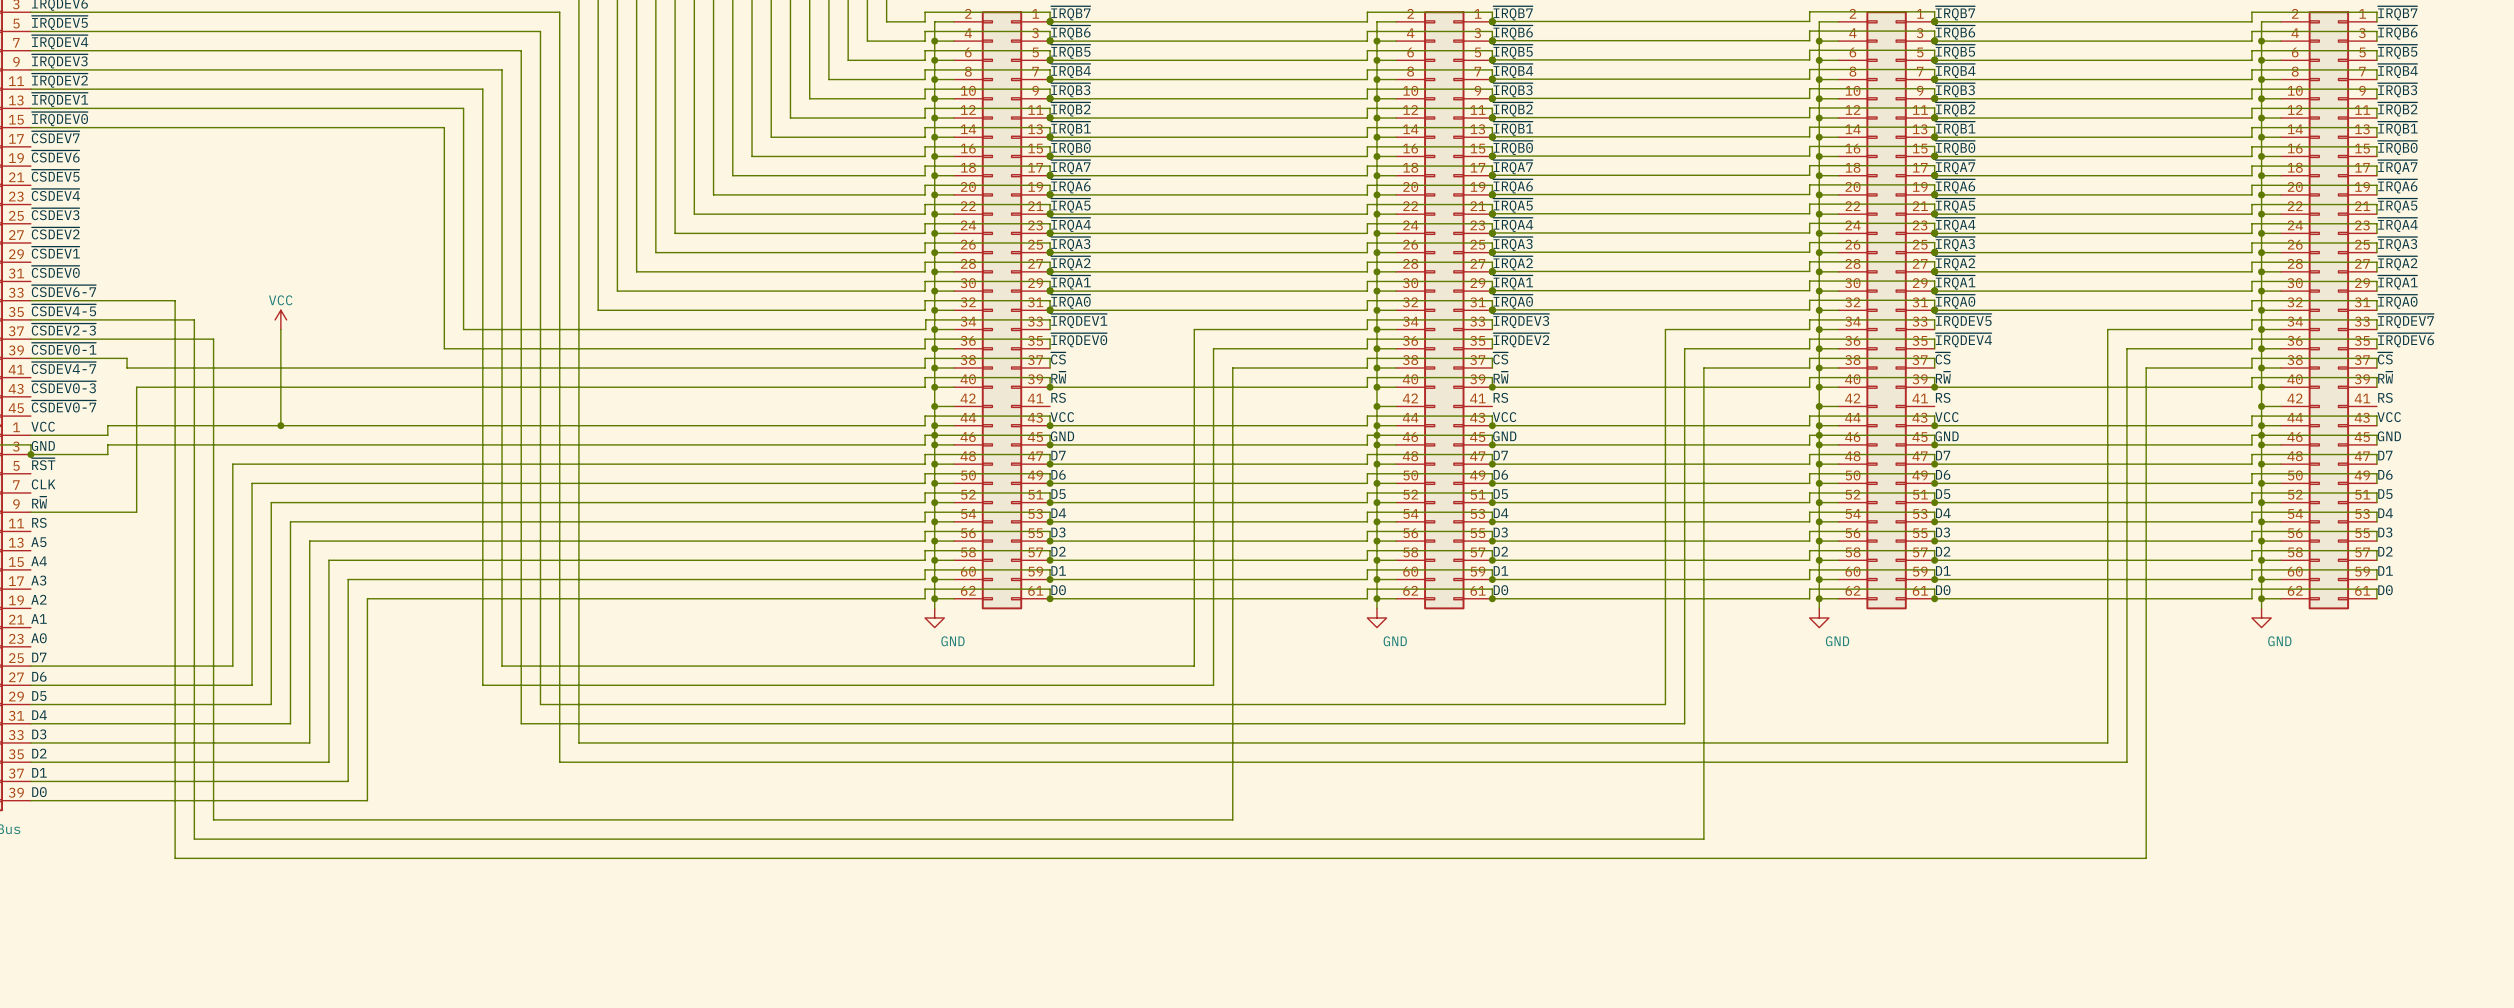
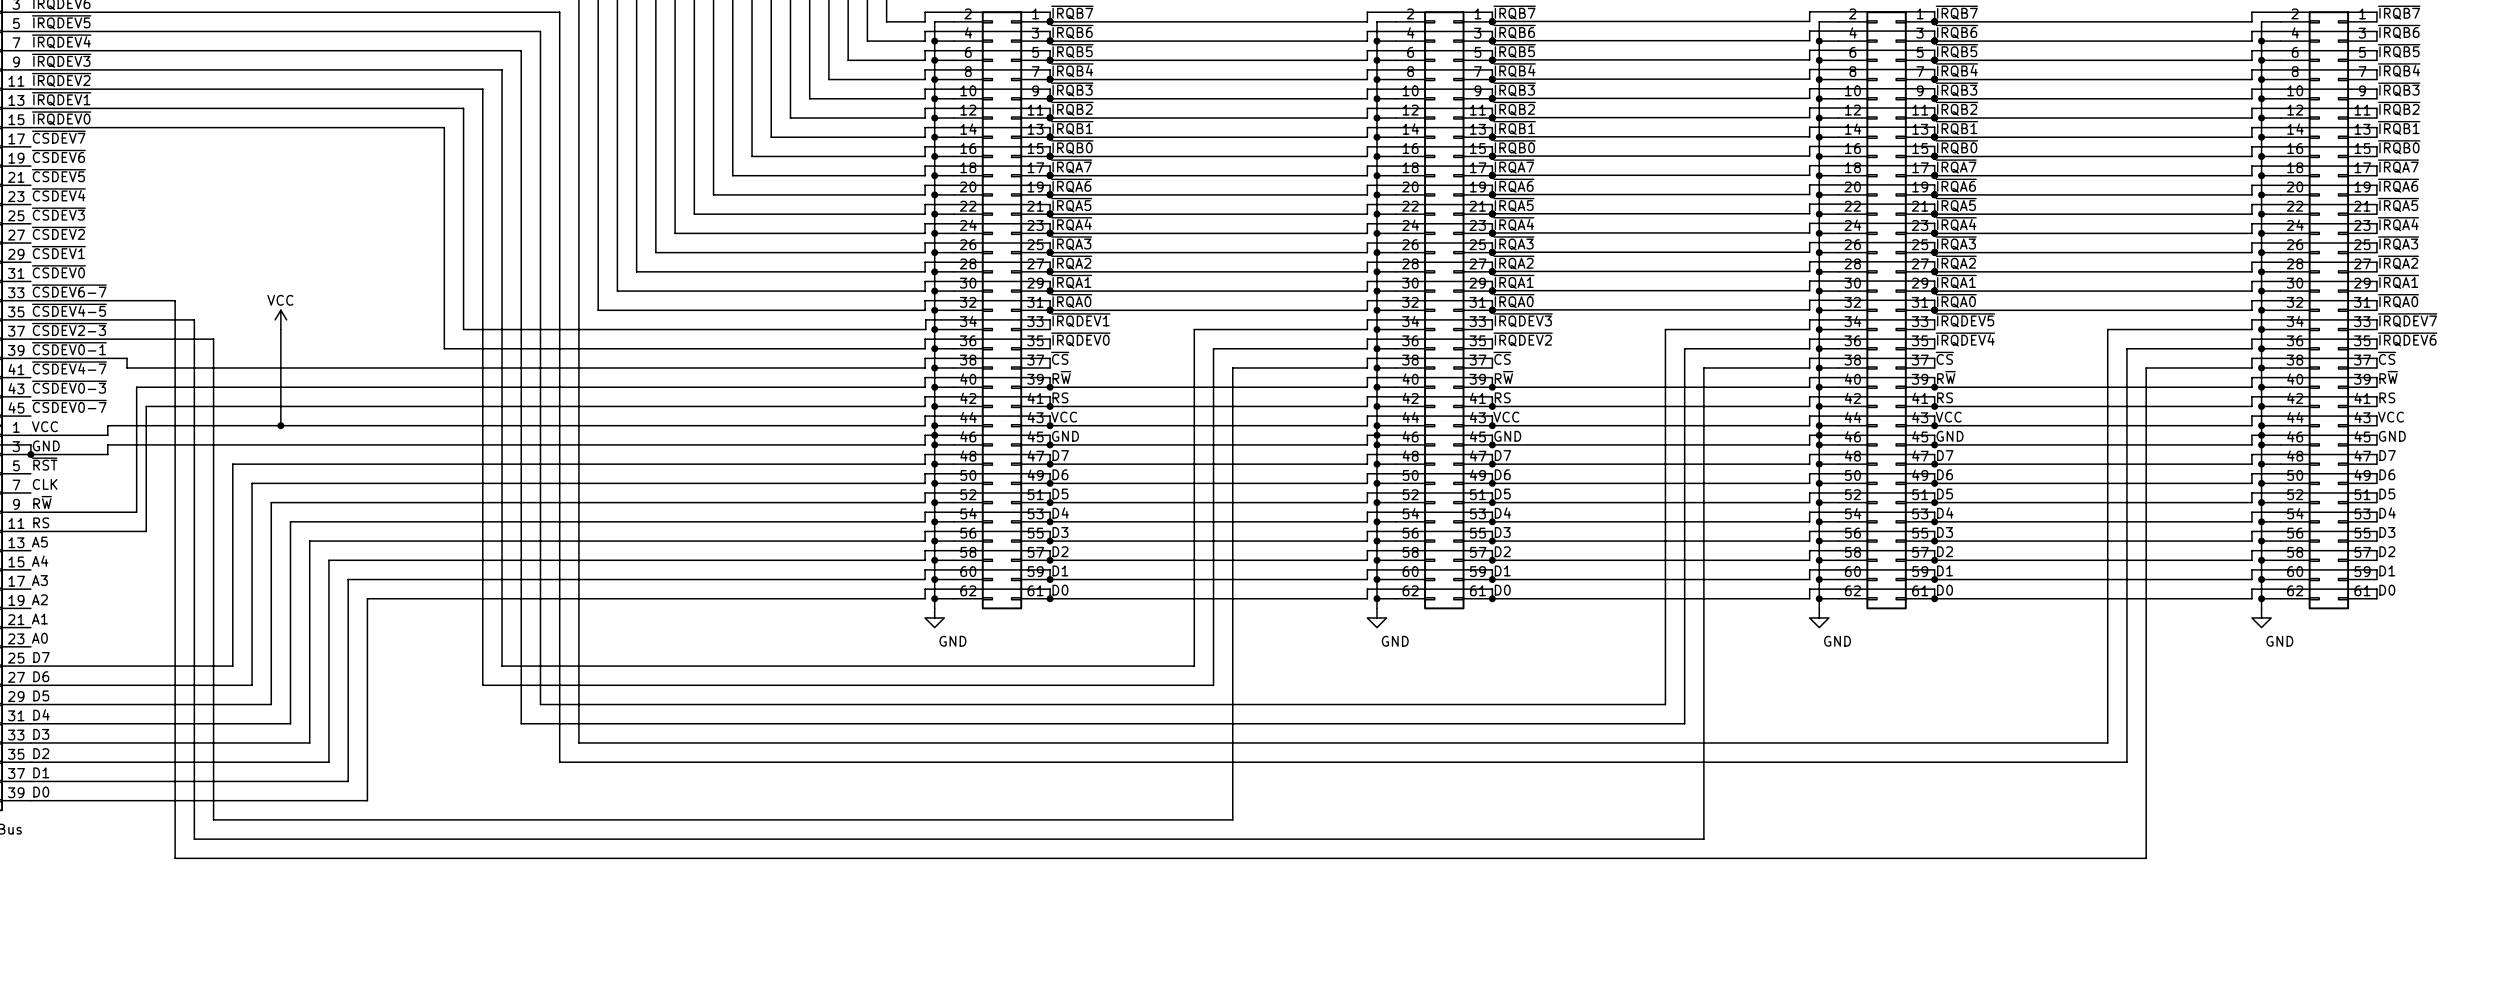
junction: none -> (1050, 406)
junction: none -> (1492, 406)
junction: none -> (1934, 406)
wire: none -> (2376, 406) (2376, 396) (2251, 396) (2251, 406) (1934, 406) (1934, 396) (1809, 396) (1809, 406) (1492, 406) (1492, 396) (1367, 396) (1367, 406) (1050, 406) (1050, 396) (925, 396) (925, 406) (146, 406) (146, 531) (30, 531)

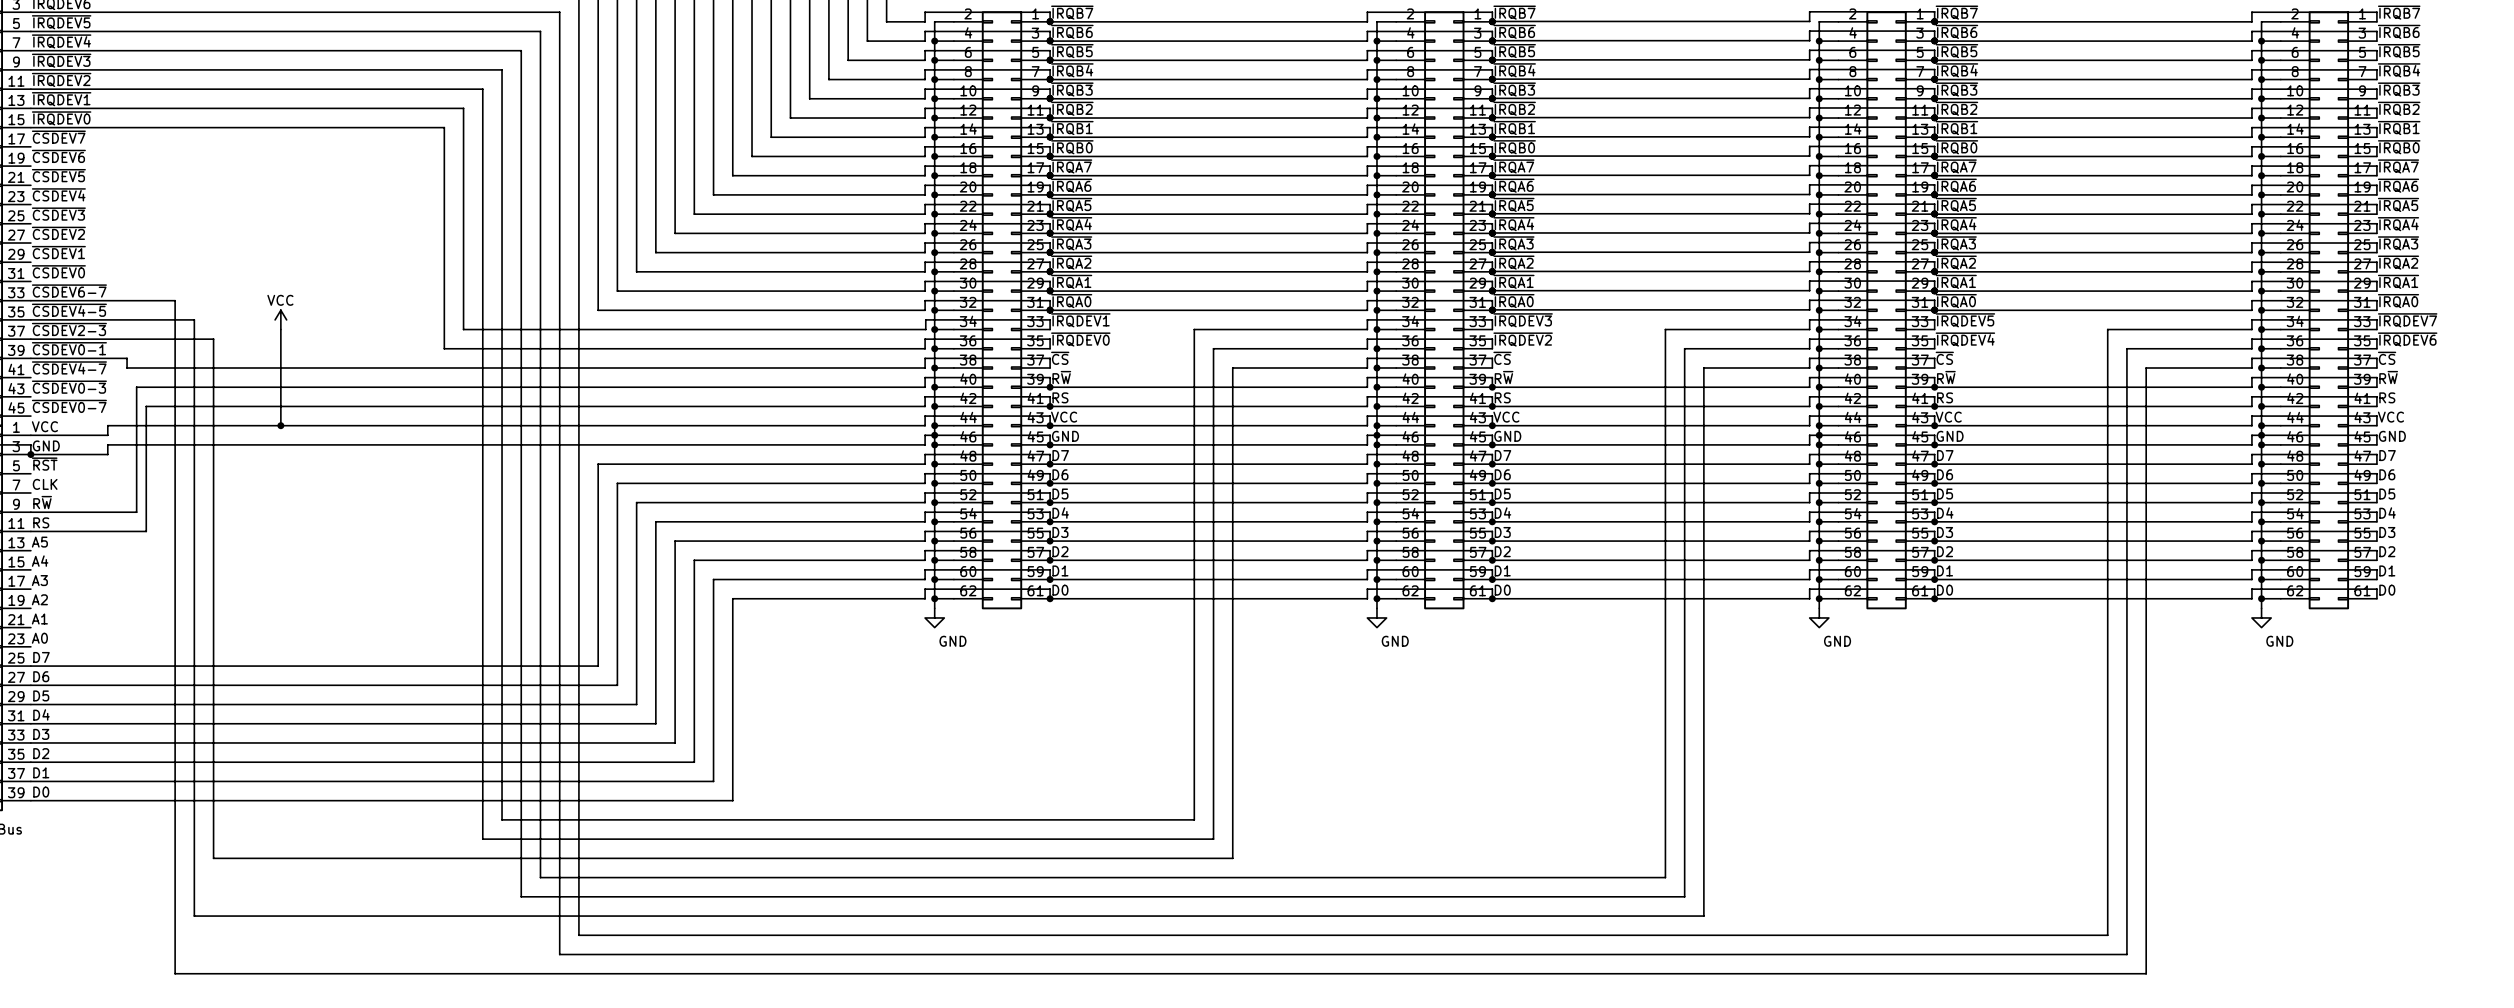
wire: (598, 464) (232, 464) (232, 666) -> (598, 464) (598, 666)
wire: (617, 483) (252, 483) (252, 685) -> (617, 483) (617, 685)
wire: (636, 502) (271, 502) (271, 704) -> (636, 502) (636, 704)
wire: (655, 521) (290, 521) (290, 723) -> (655, 521) (655, 723)
wire: (675, 541) (309, 541) (309, 742) -> (675, 541) (675, 742)
wire: (694, 560) (328, 560) (328, 762) -> (694, 560) (694, 762)
wire: (713, 579) (348, 579) (348, 781) -> (713, 579) (713, 781) (348, 781)
wire: (732, 598) (367, 598) (367, 800) -> (732, 598) (732, 800) (367, 800)
wire: (598, 666) (1194, 666) -> (1194, 819) (1194, 666)
wire: (617, 685) (1213, 685) -> none
wire: (636, 704) (1665, 704) -> (271, 704) (540, 704) (540, 877) (1665, 877) (1665, 704)
wire: (655, 723) (1684, 723) -> (290, 723) (521, 723) (521, 896) (1684, 896) (1684, 723)
wire: (675, 742) (2107, 742) -> (309, 742) (578, 742) (578, 935) (2107, 935) (2107, 742)
wire: (694, 762) (2126, 762) -> (328, 762) (559, 762) (559, 954) (2126, 954) (2126, 762)
wire: (213, 819) (502, 819) -> (232, 666) (502, 666) (502, 819)
wire: (1194, 819) (1232, 819) -> (1232, 858) (1232, 819)
wire: (194, 839) (482, 839) -> (252, 685) (482, 685) (482, 839)
wire: none -> (194, 839) (194, 916) (1703, 916) (1703, 839)
wire: (1213, 839) (1703, 839) -> (1213, 839) (1213, 685)
wire: (175, 858) (213, 858) -> (213, 819) (213, 858)
wire: (1232, 858) (2146, 858) -> (175, 858) (175, 973) (2146, 973) (2146, 858)

